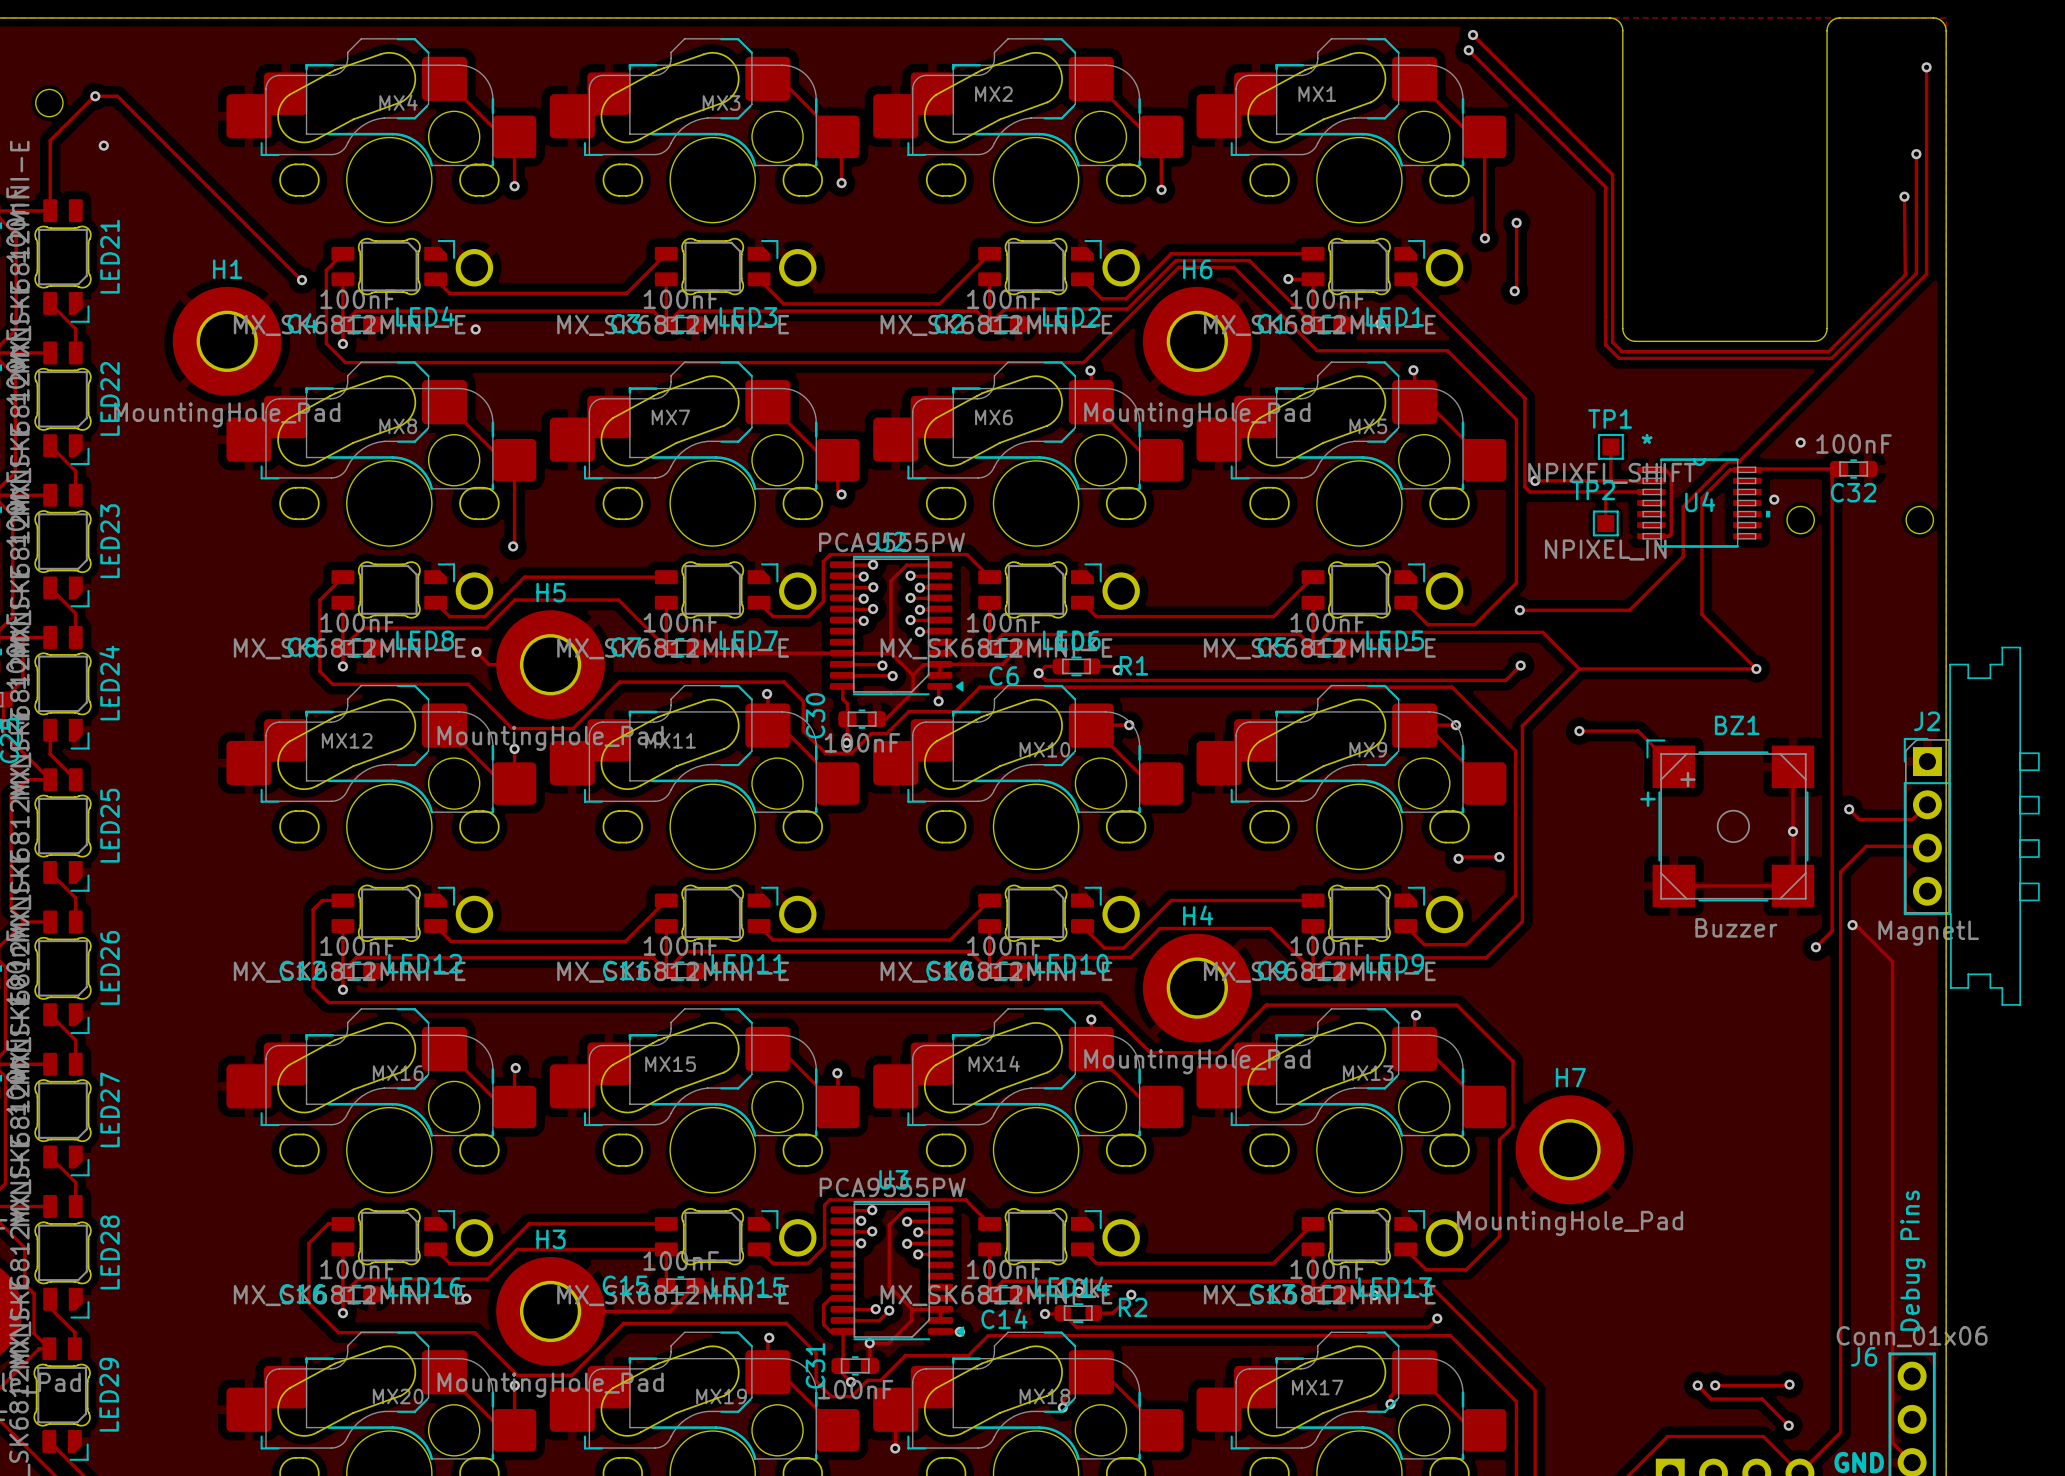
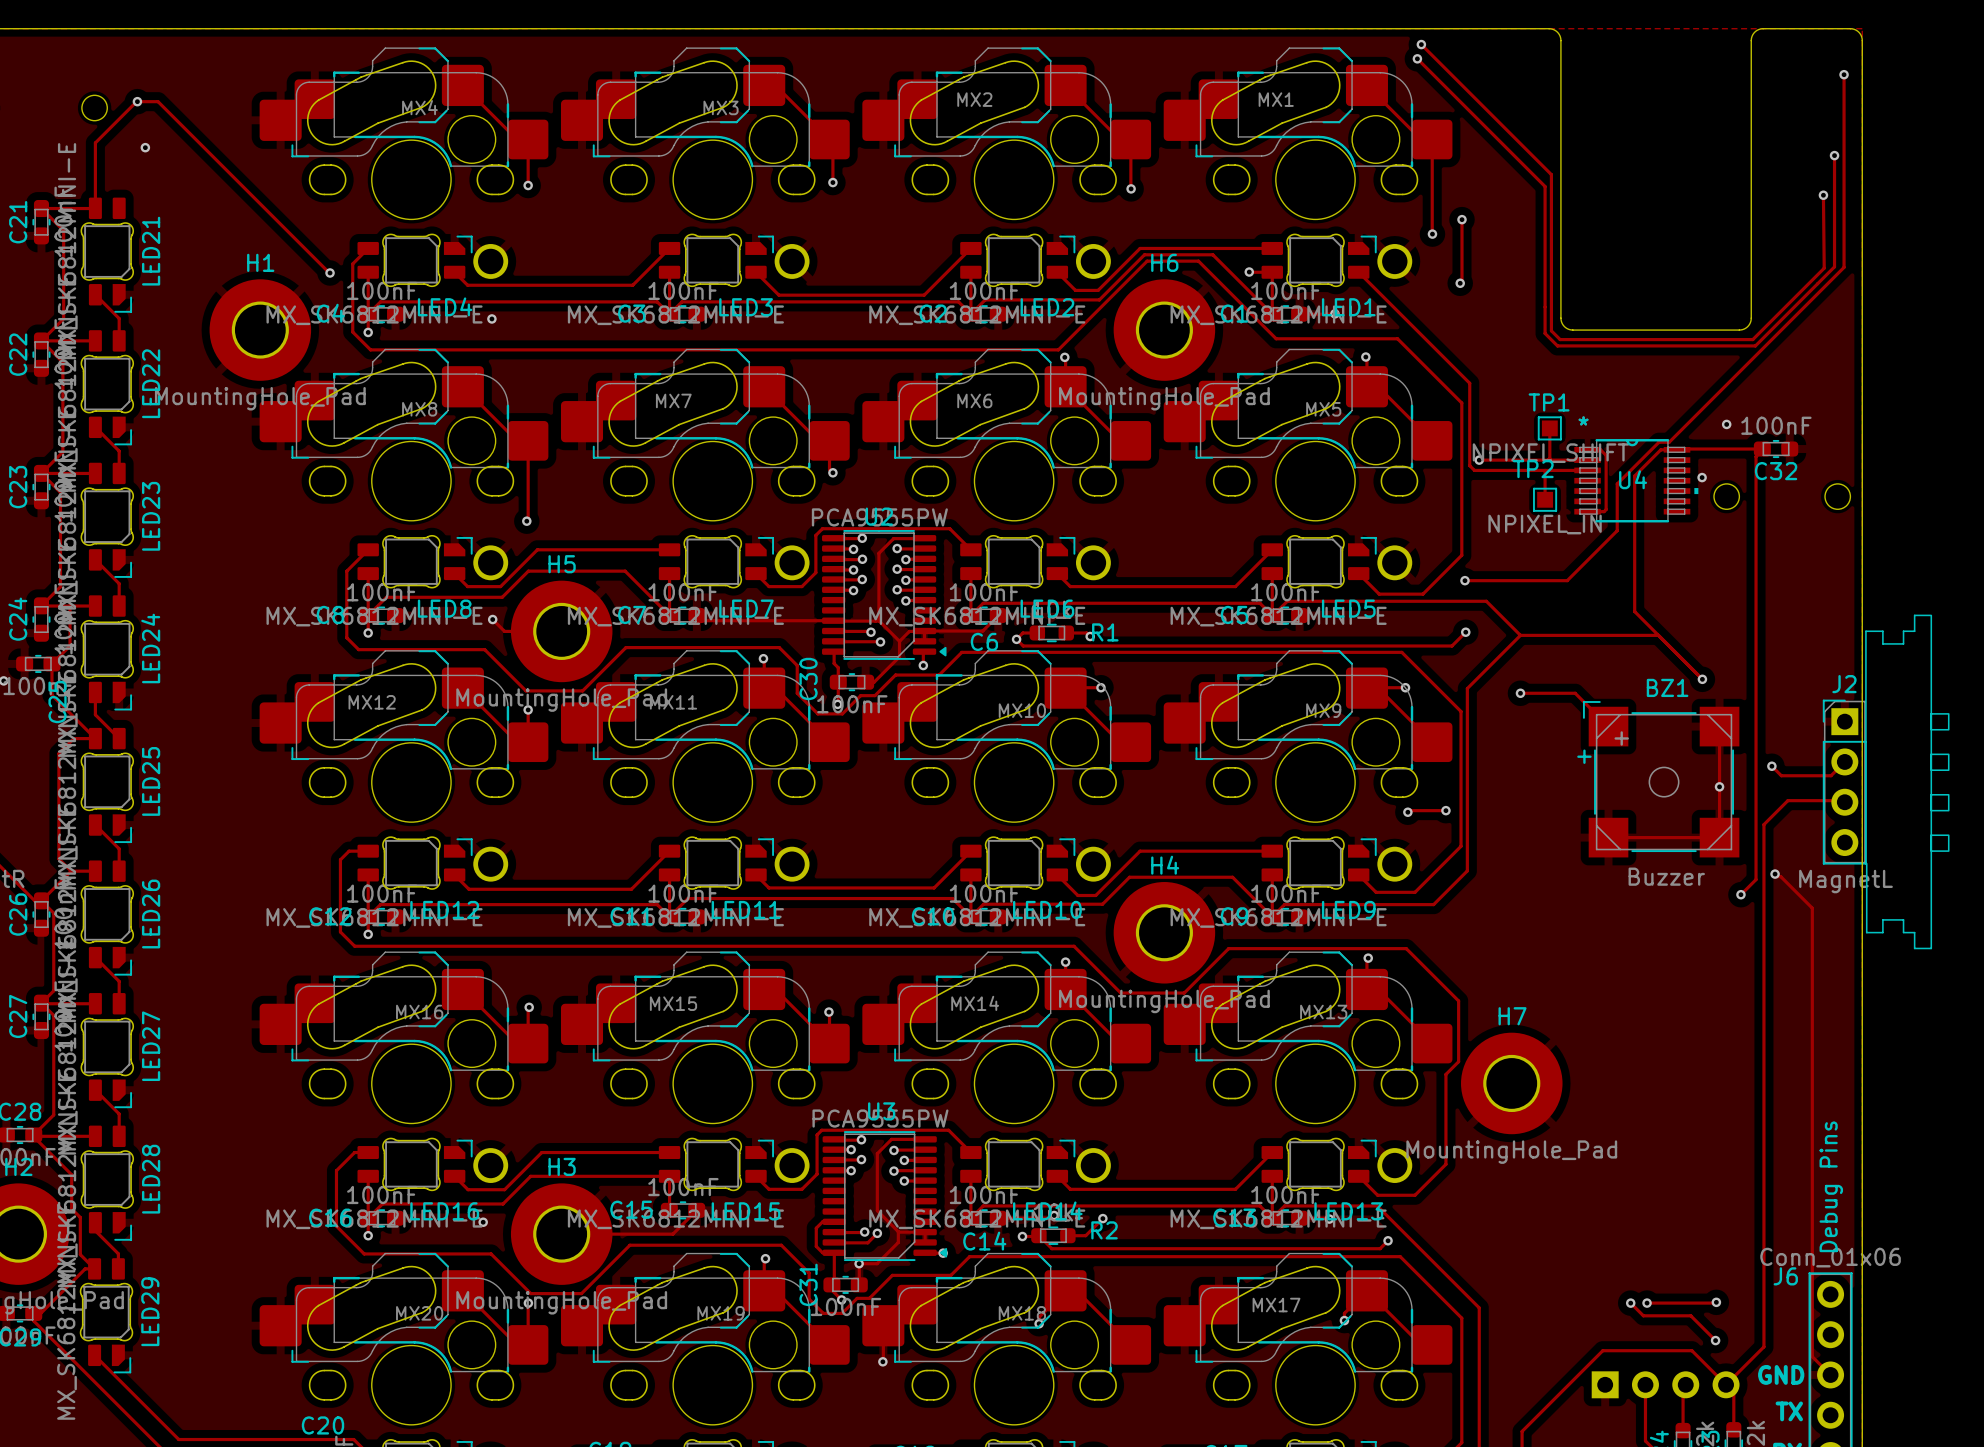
track: (1701, 614) (1756, 668) (1727, 668) -> (1634, 584) (1634, 611) (1702, 679)
via position: (1756, 668) -> (1702, 679)

